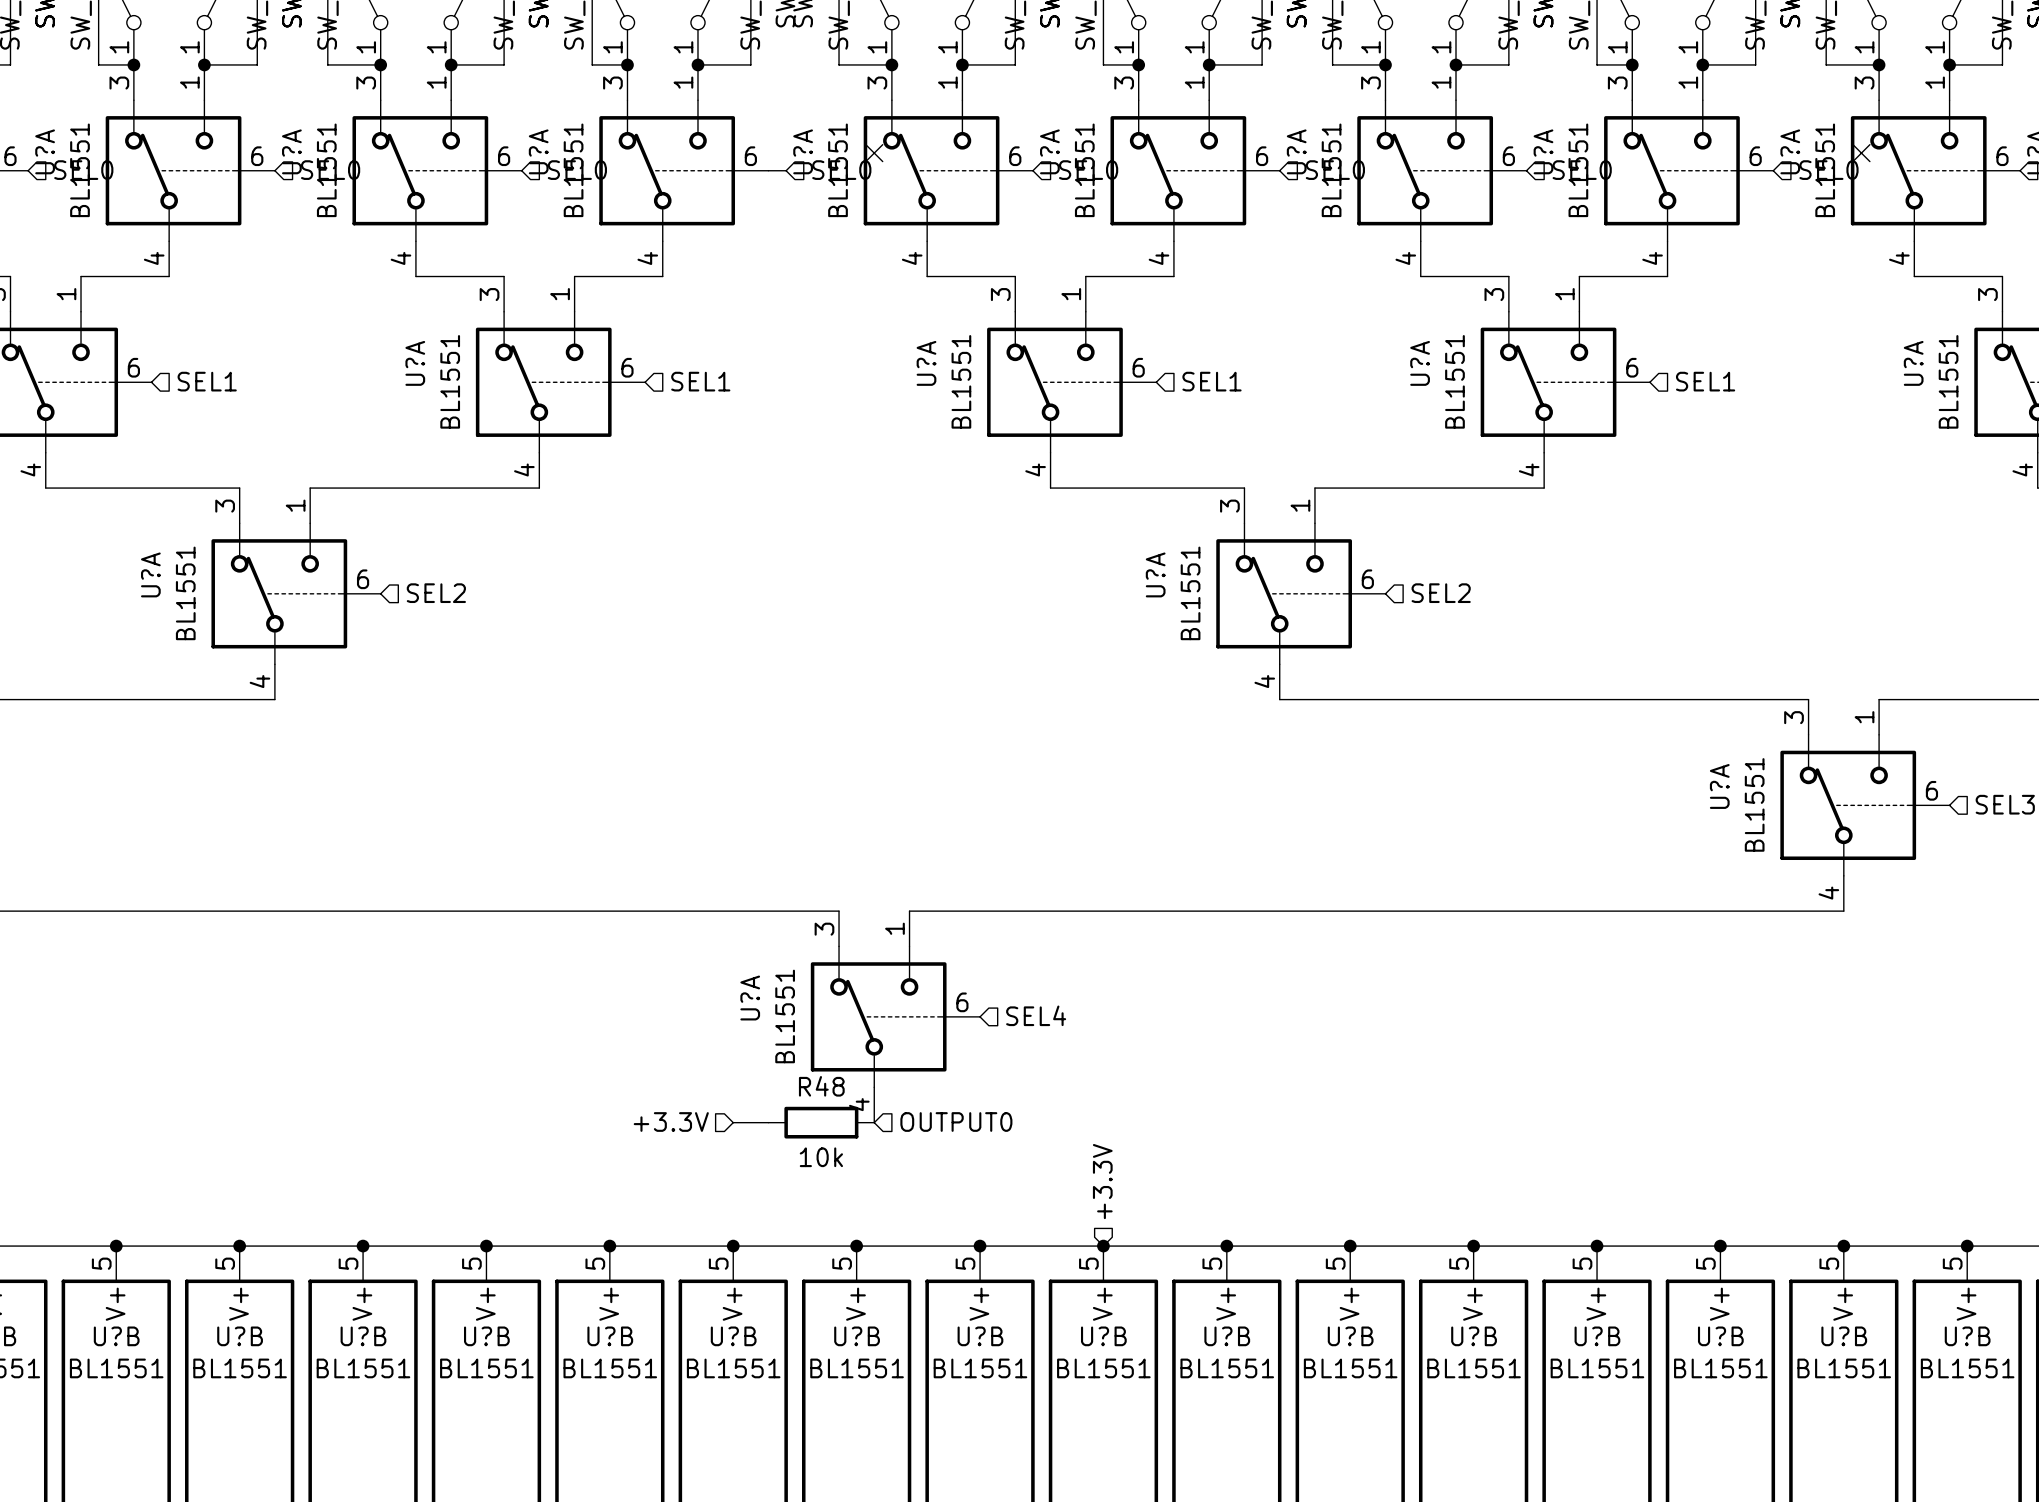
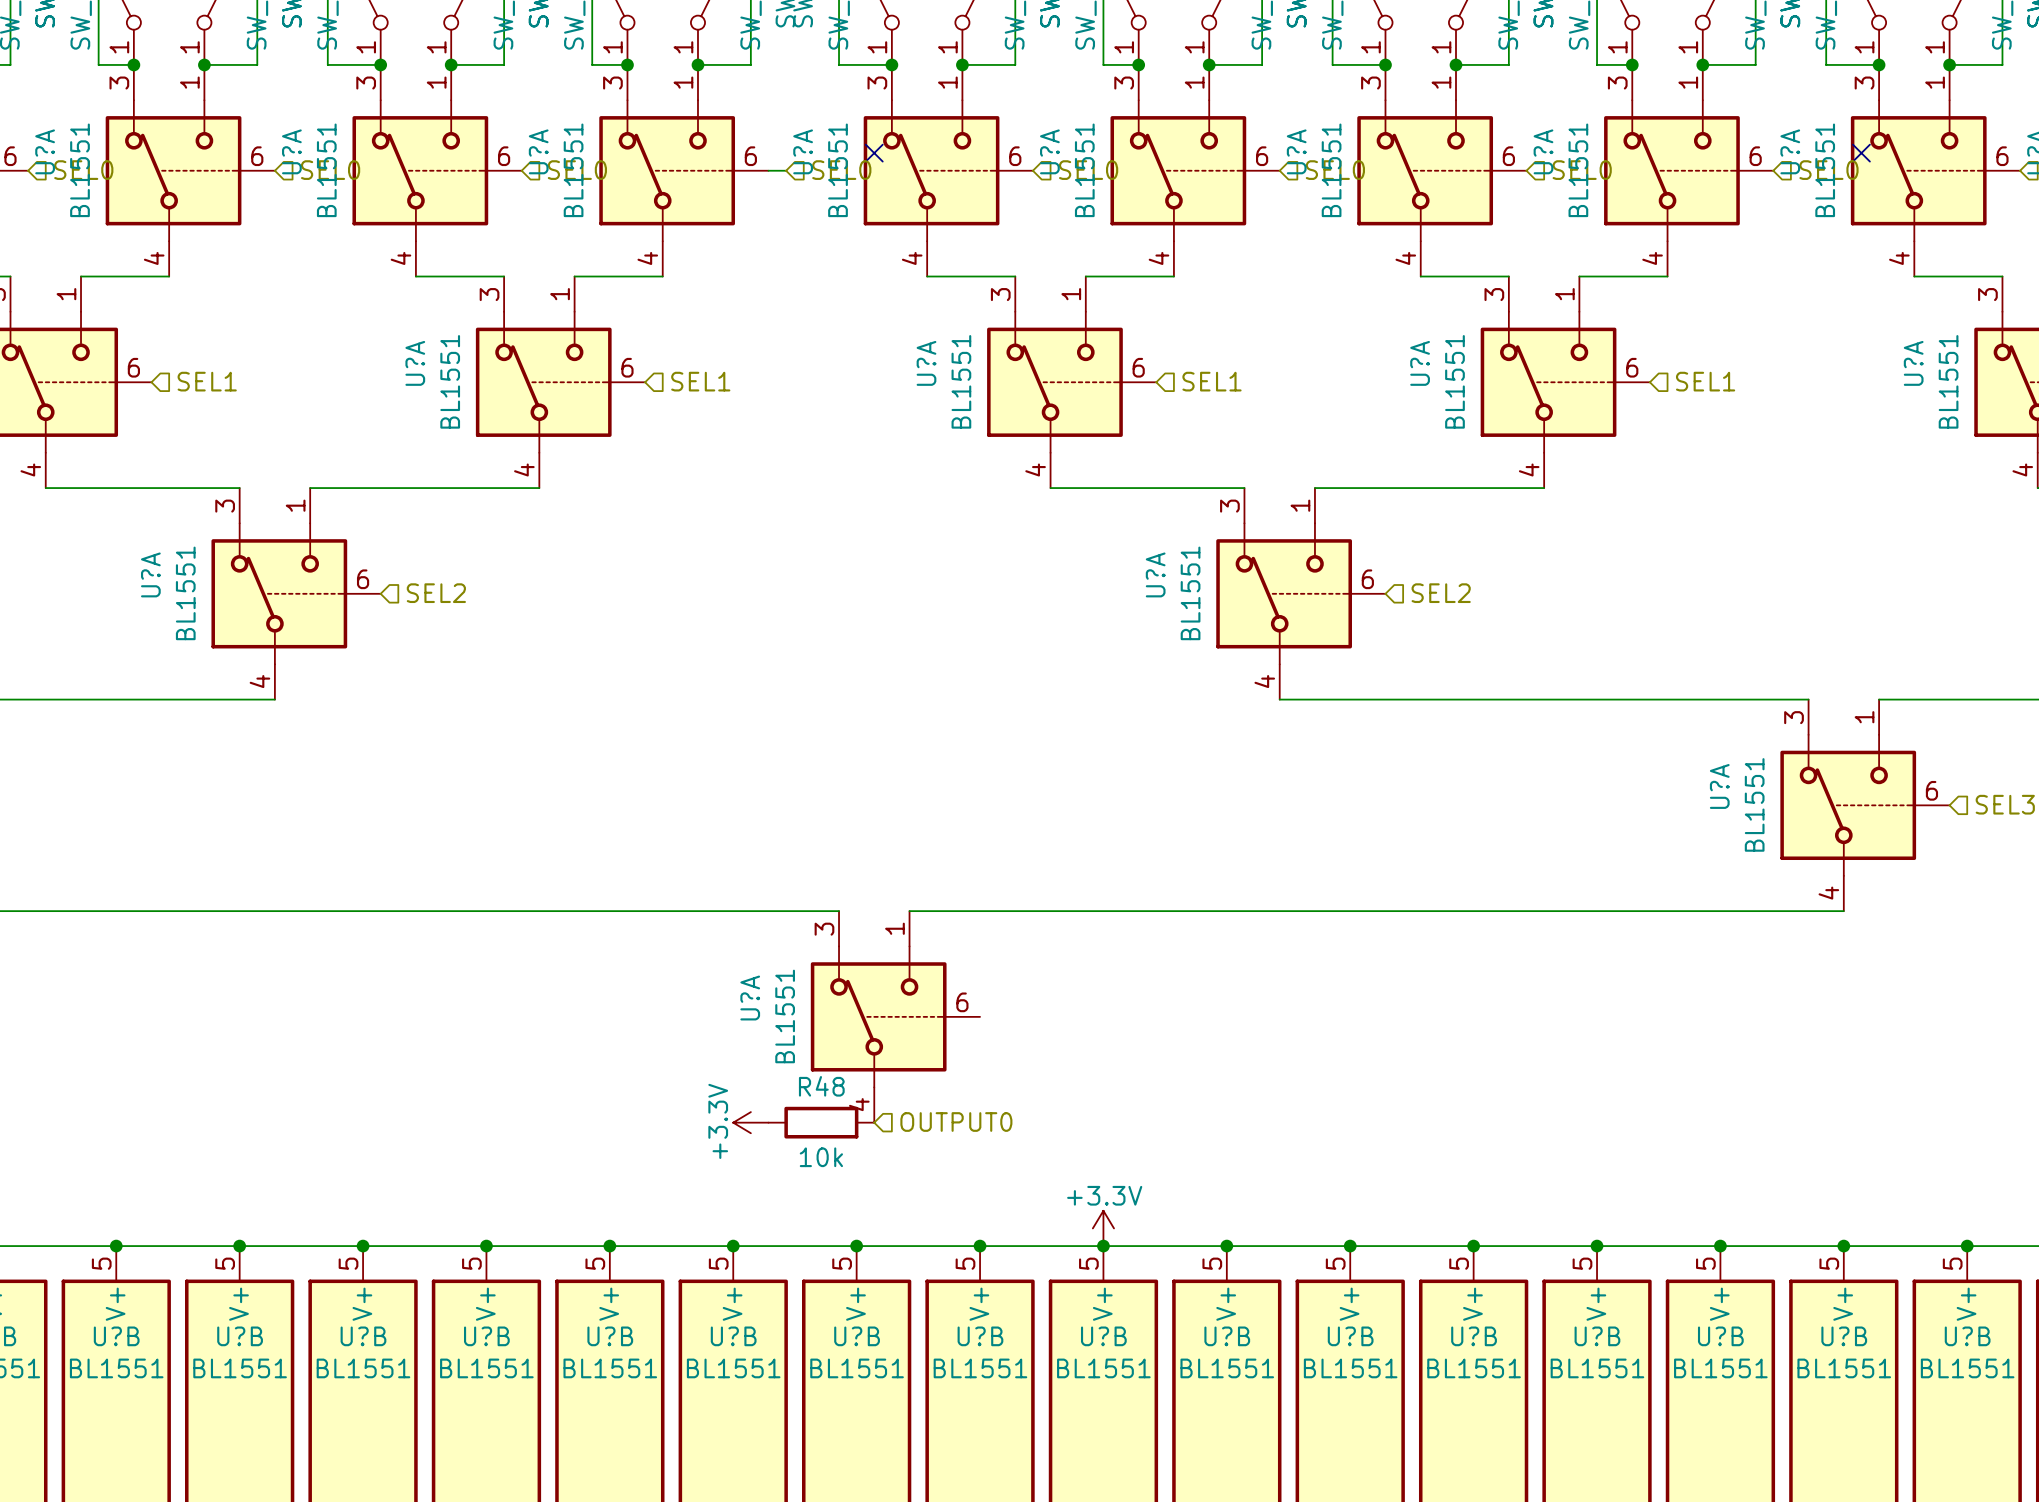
hierarchical label: SEL4 (1036, 1015) -> none
hierarchical label: +3.3V (671, 1122) -> none
power symbol: none -> +3.3V (750, 1122)
hierarchical label: +3.3V (1102, 1181) -> none
power symbol: none -> +3.3V (1103, 1228)

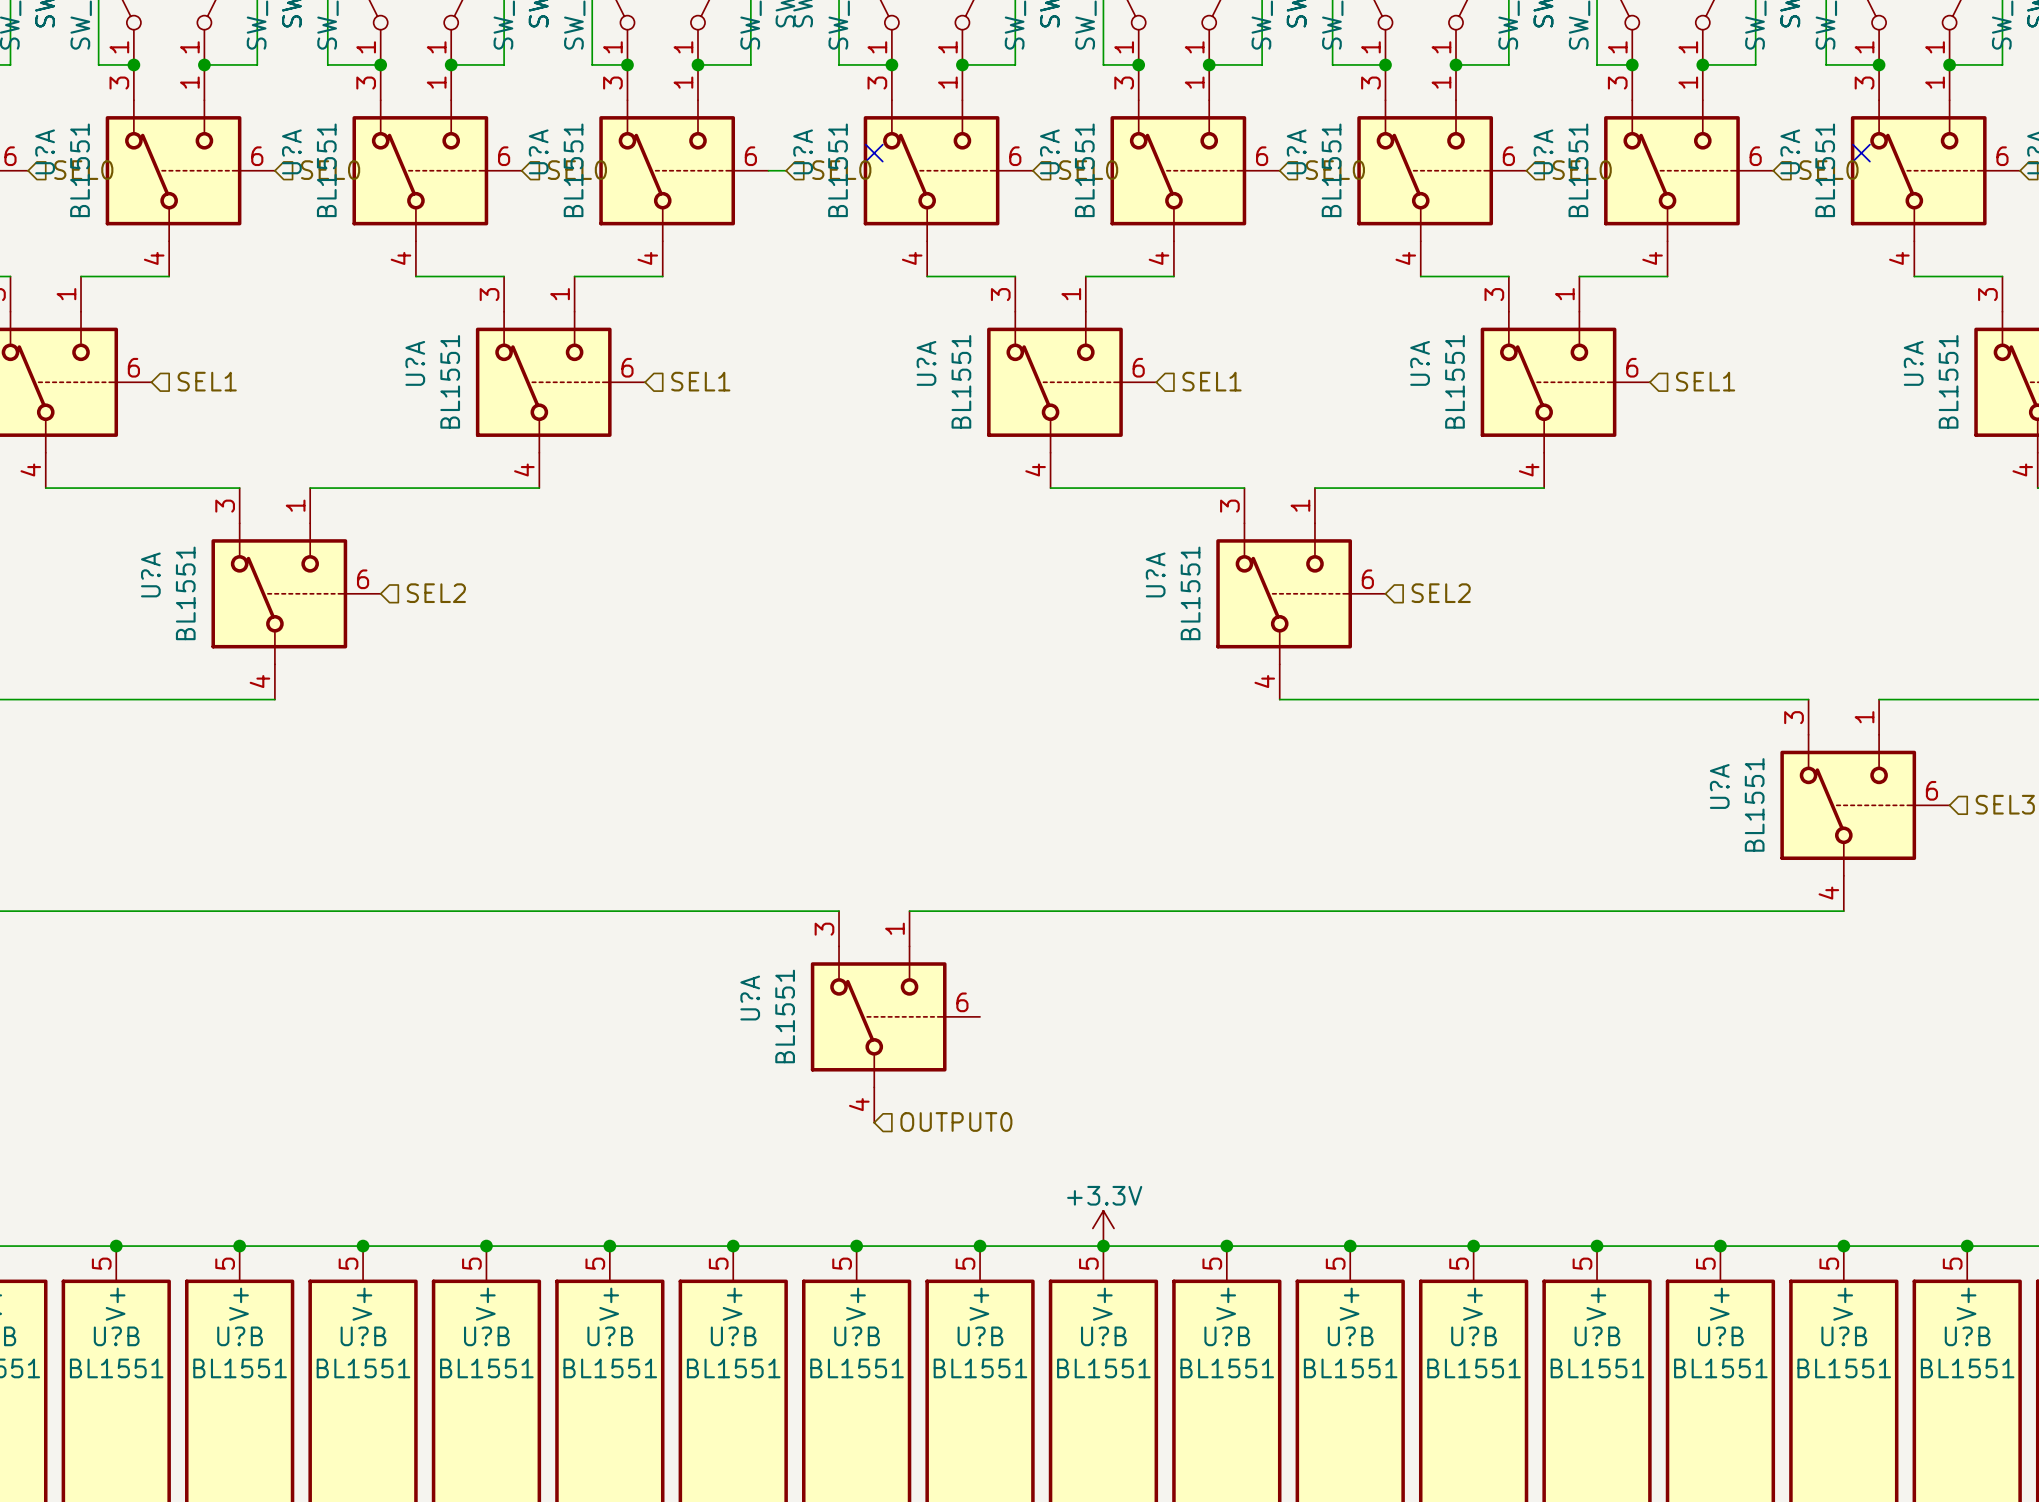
power symbol: +3.3V (750, 1122) -> none
R48: 10k (821, 1122) -> none

